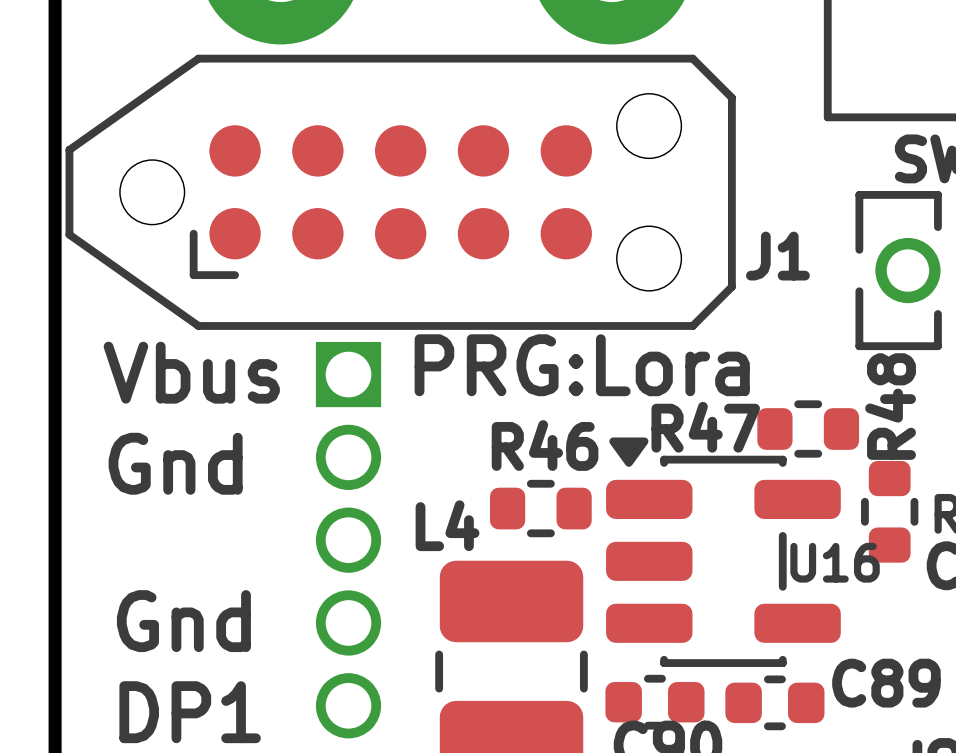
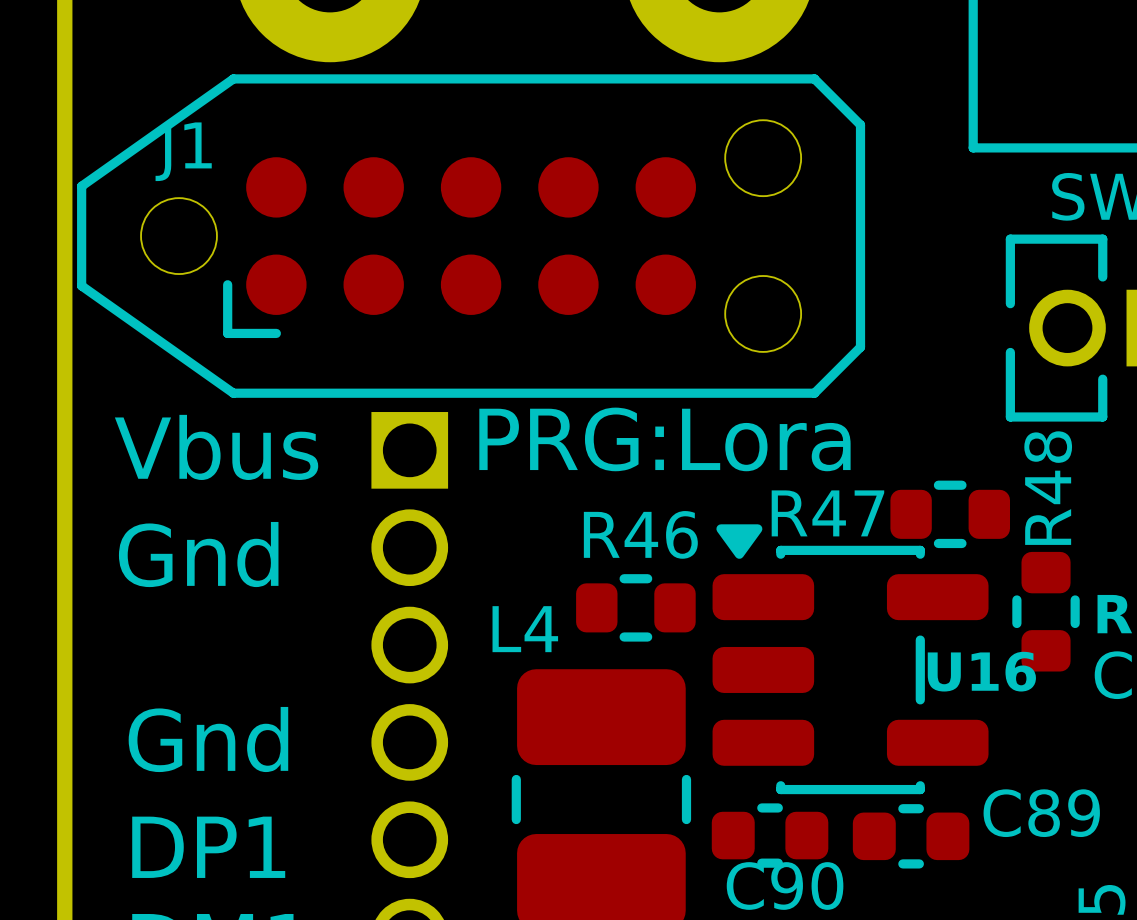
J1 name position: J1 (777, 256) -> J1 (183, 151)

